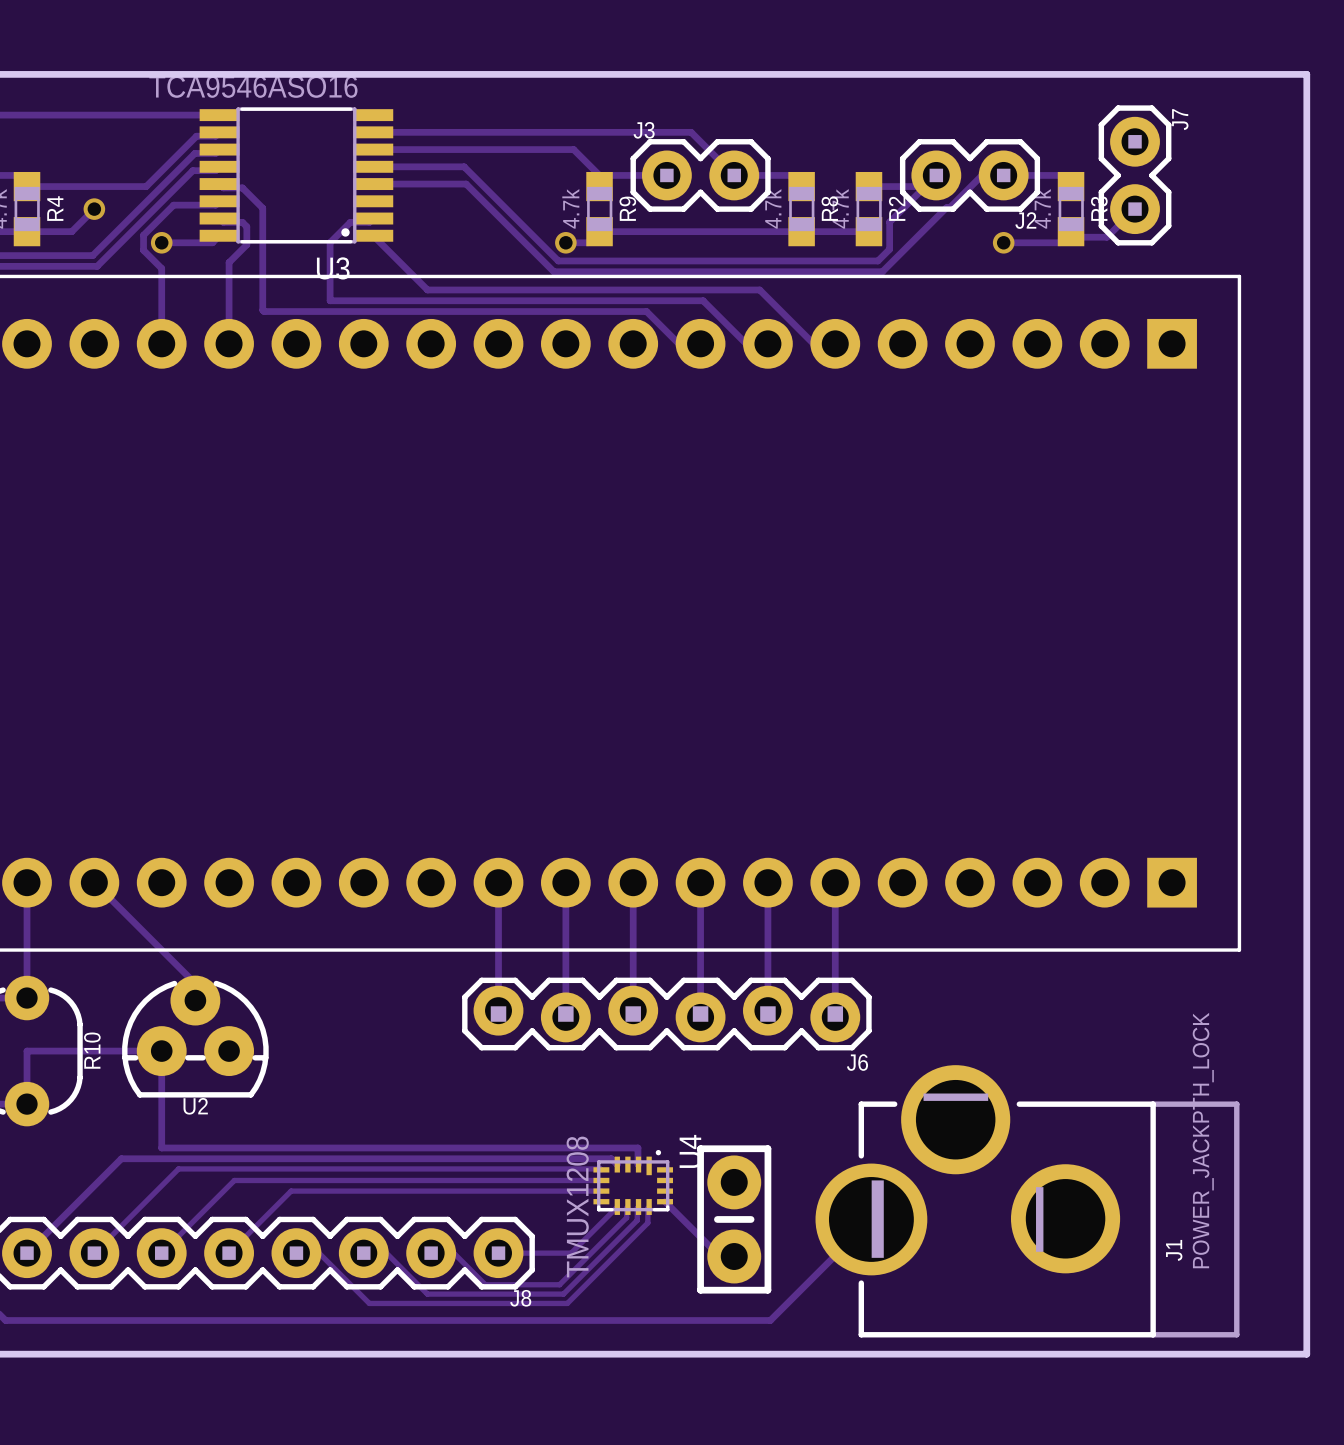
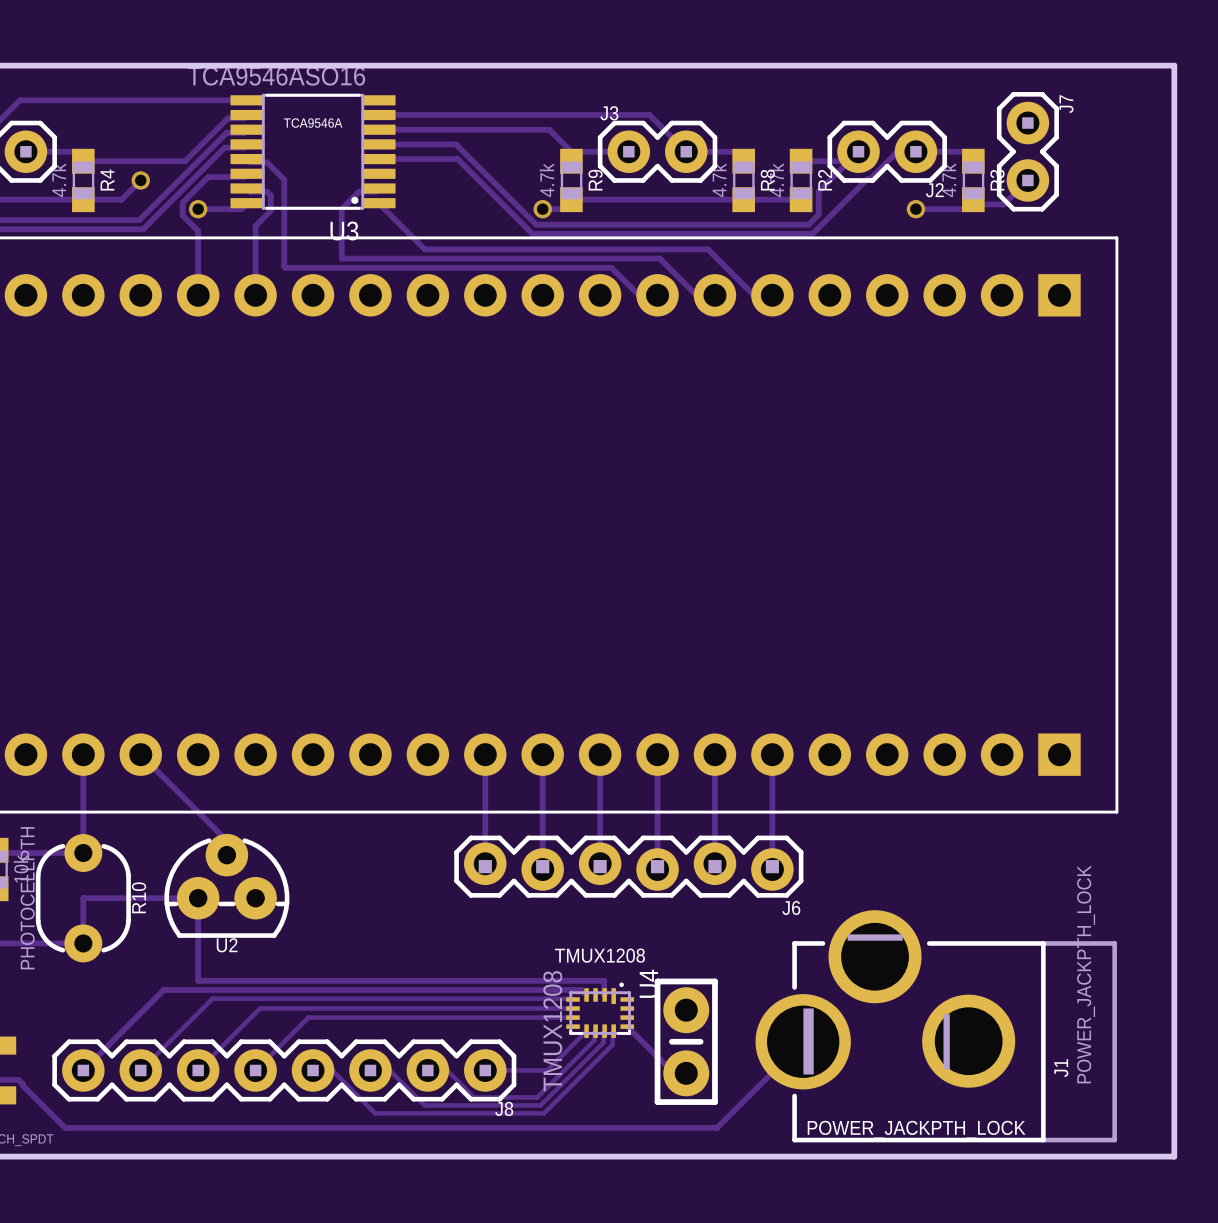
text: none -> TCA9546A (313, 123)
text: none -> TMUX1208 (599, 955)
text: none -> POWER_JACKPTH_LOCK (916, 1129)

